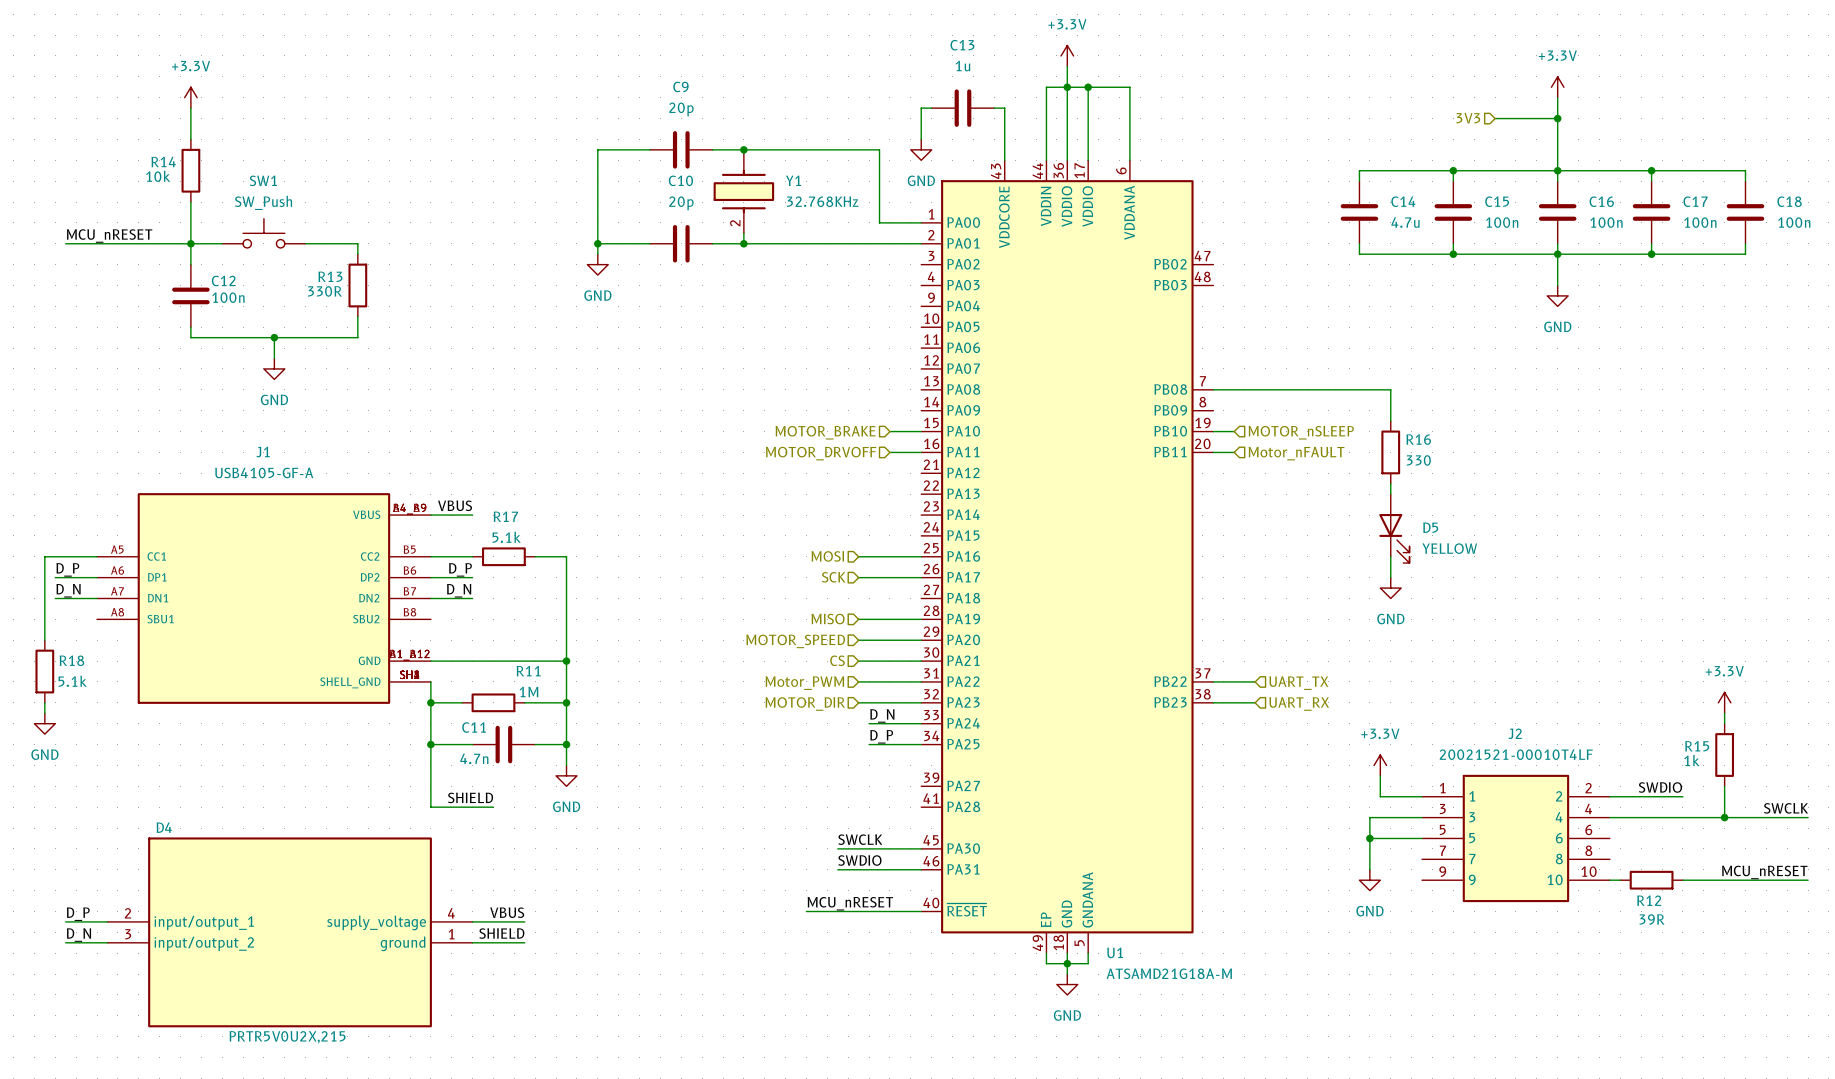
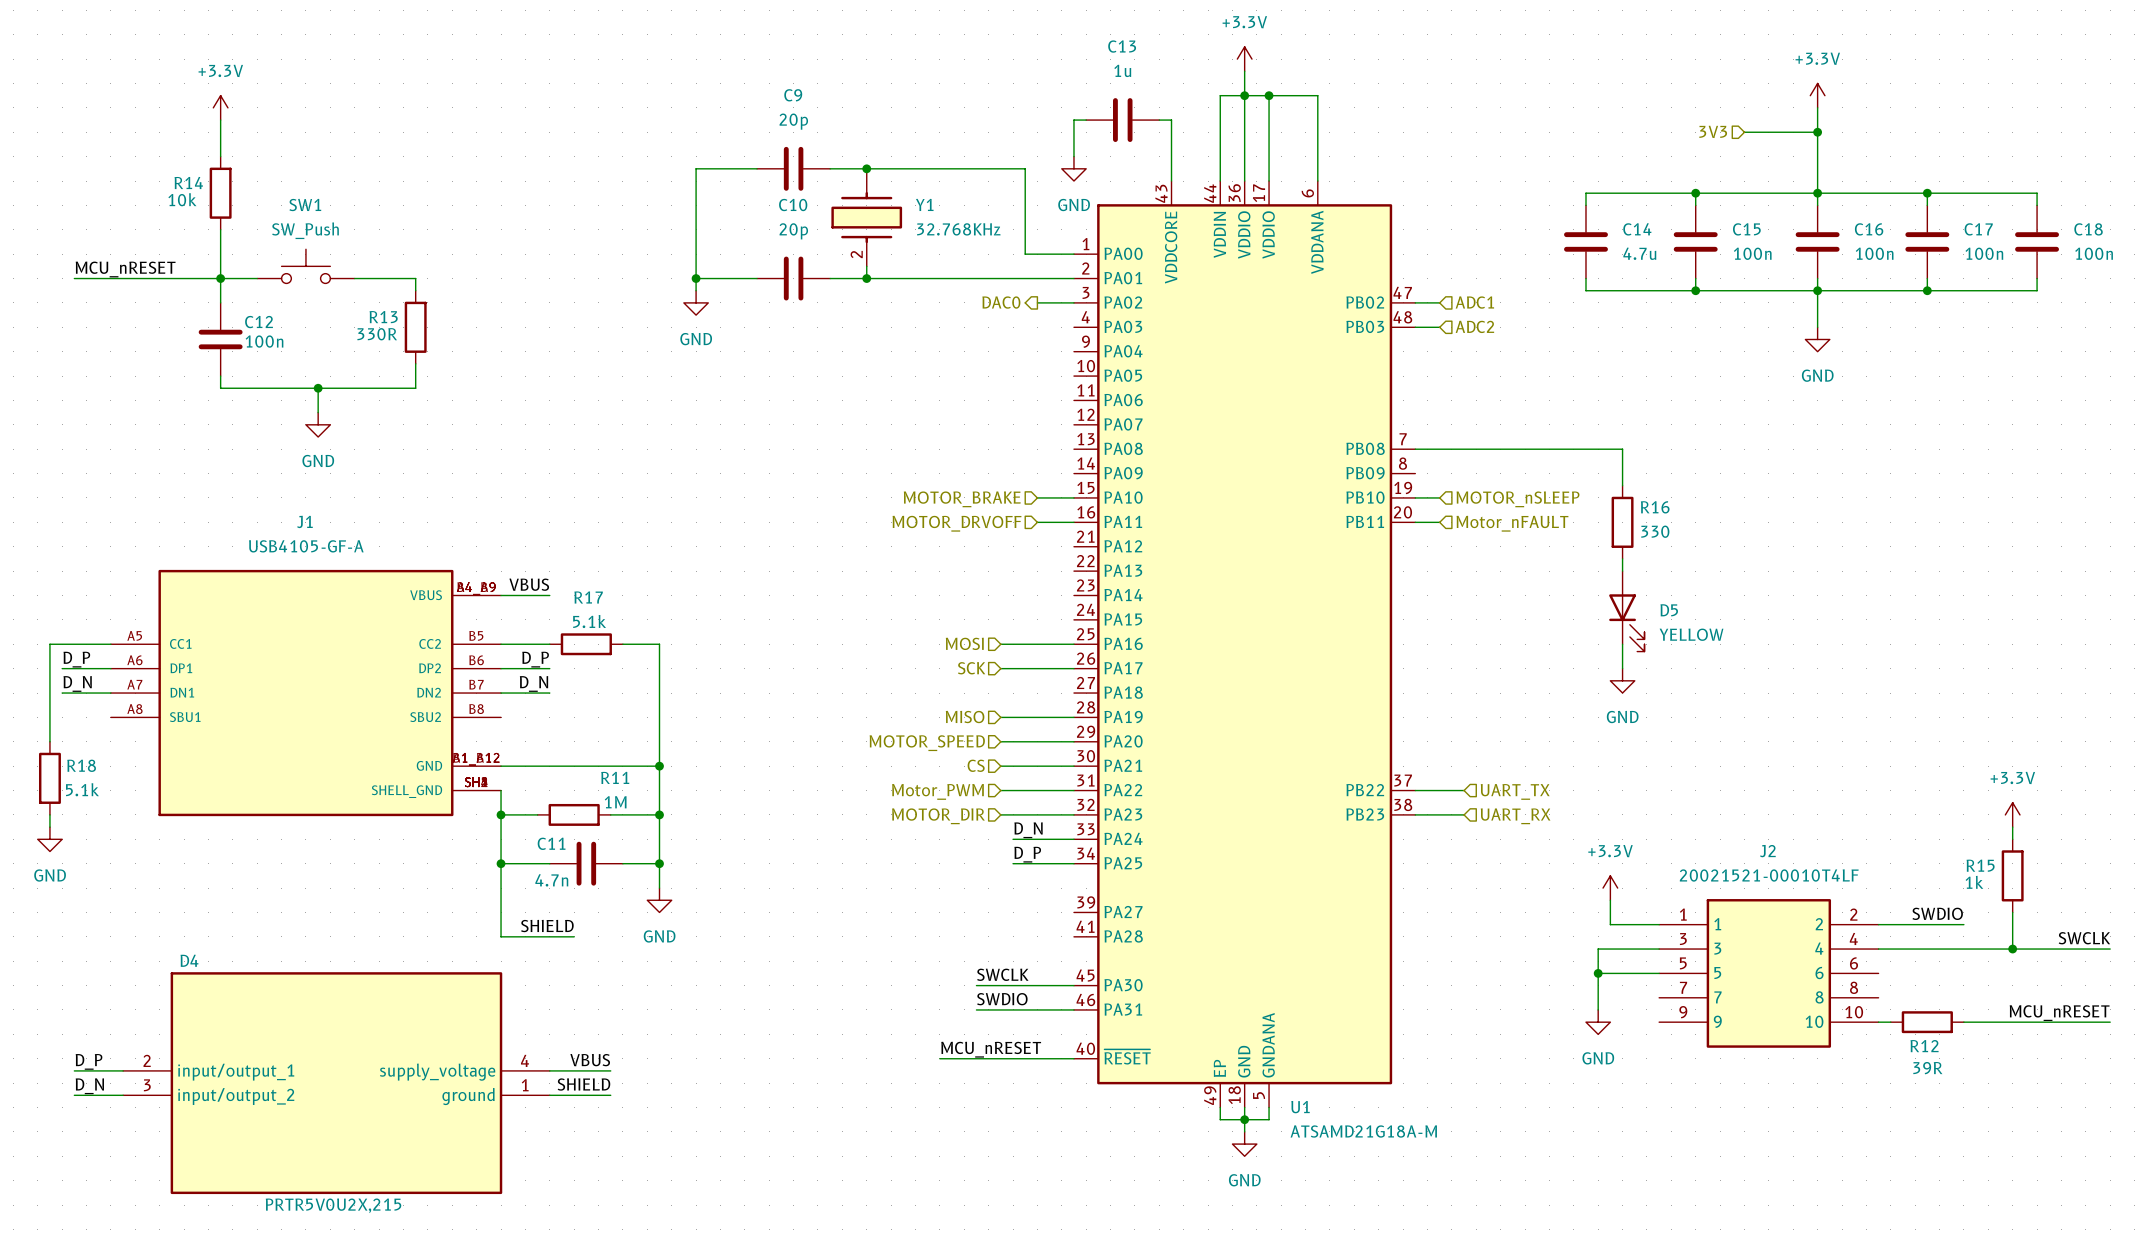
hierarchical label: none -> DAC0 (1001, 302)
wire: none -> (1037, 302) (1073, 302)
wire: none -> (1415, 302) (1439, 302)
hierarchical label: none -> ADC1 (1474, 302)
wire: none -> (1415, 327) (1439, 327)
hierarchical label: none -> ADC2 (1474, 326)

